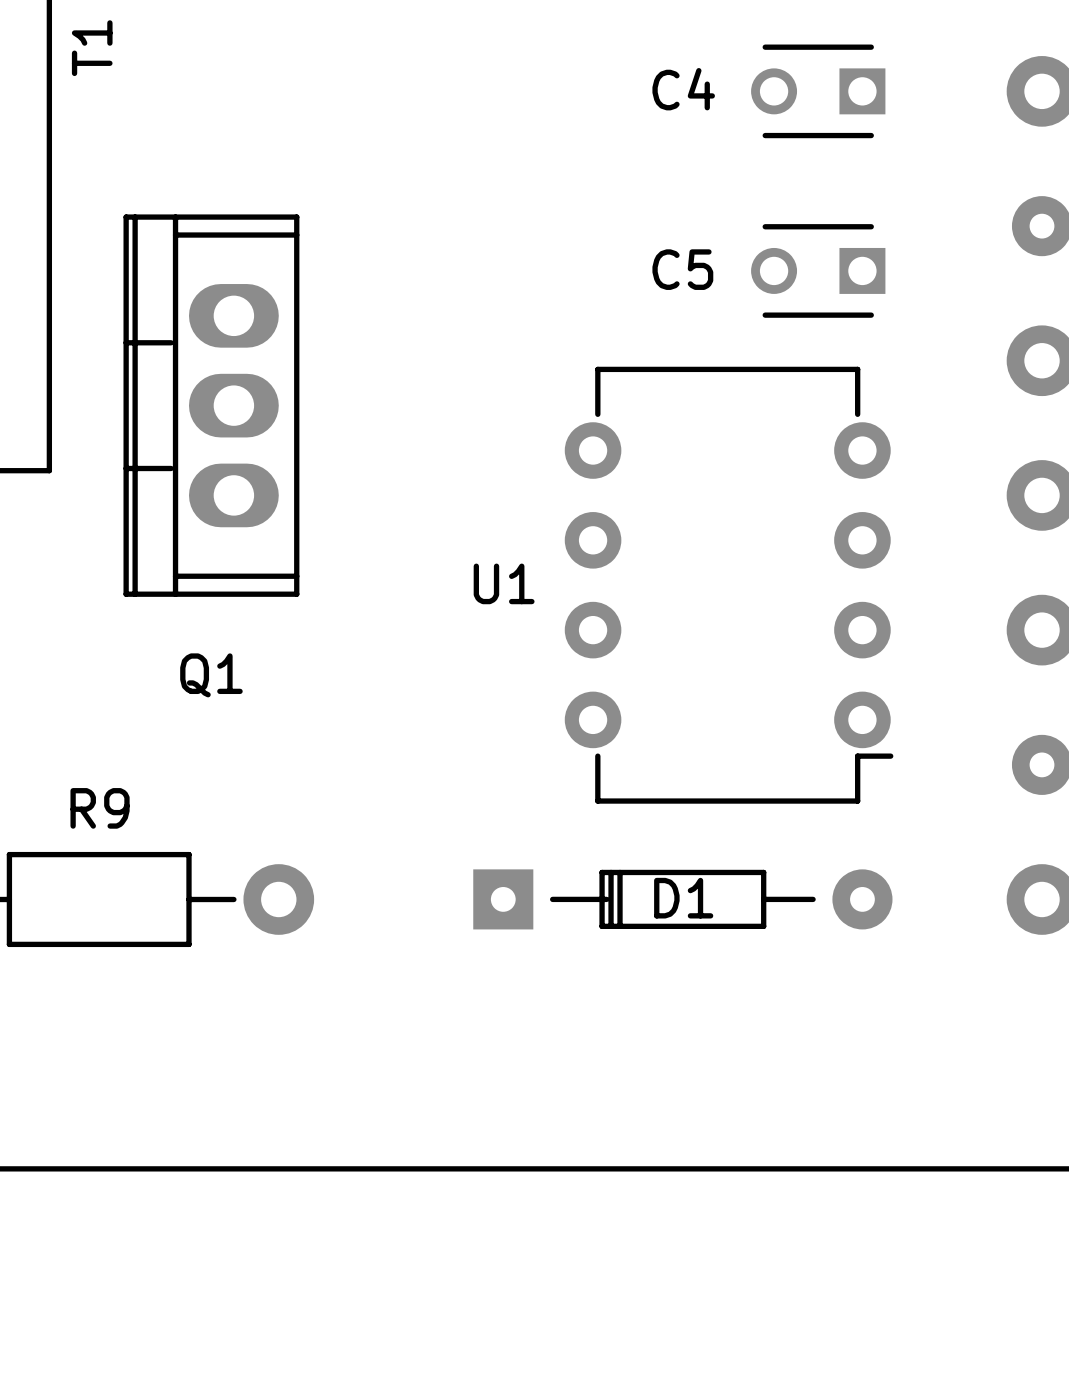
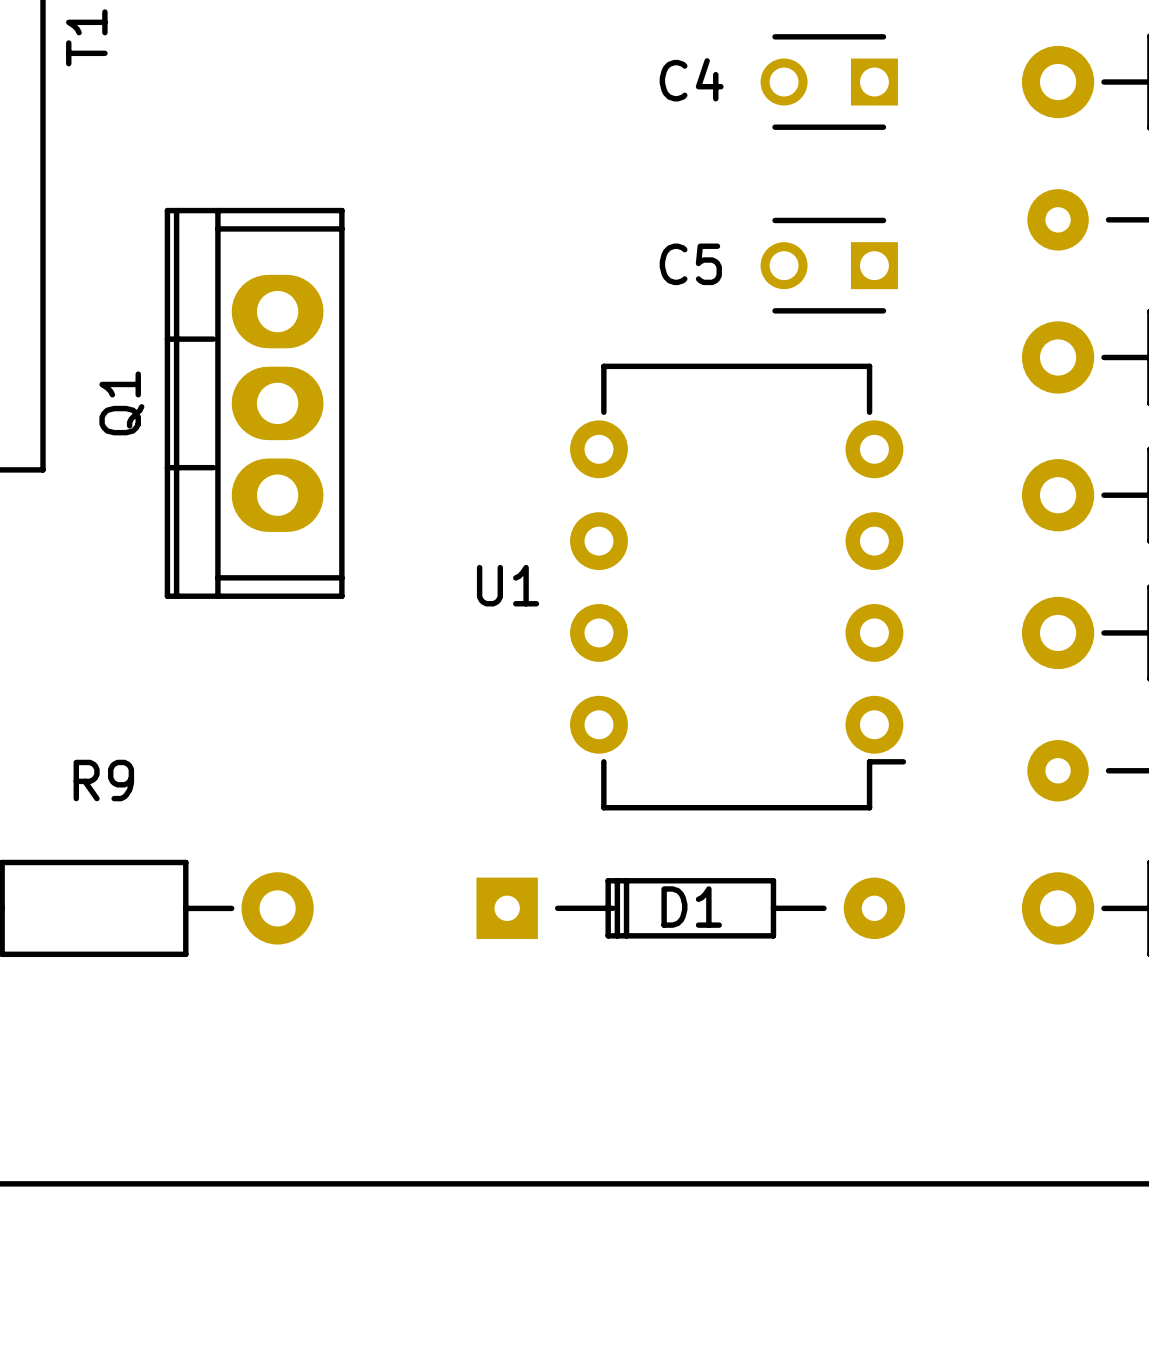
Q1 footprint: [123, 214, 300, 597] -> [164, 207, 345, 599]
Q1 name position: Q1 (211, 675) -> Q1 (121, 403)
R9 name position: R9 (100, 808) -> R9 (103, 780)

